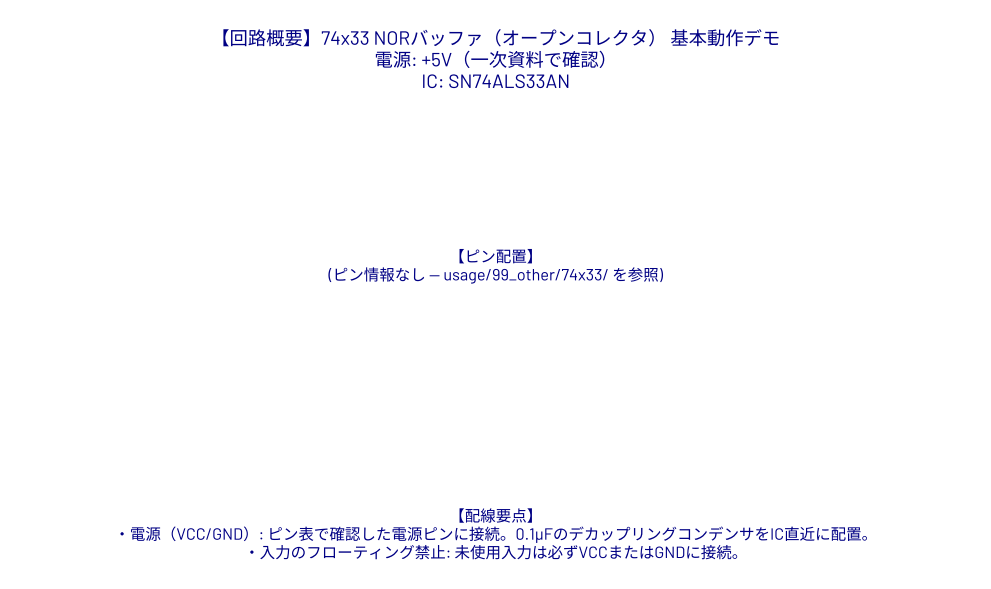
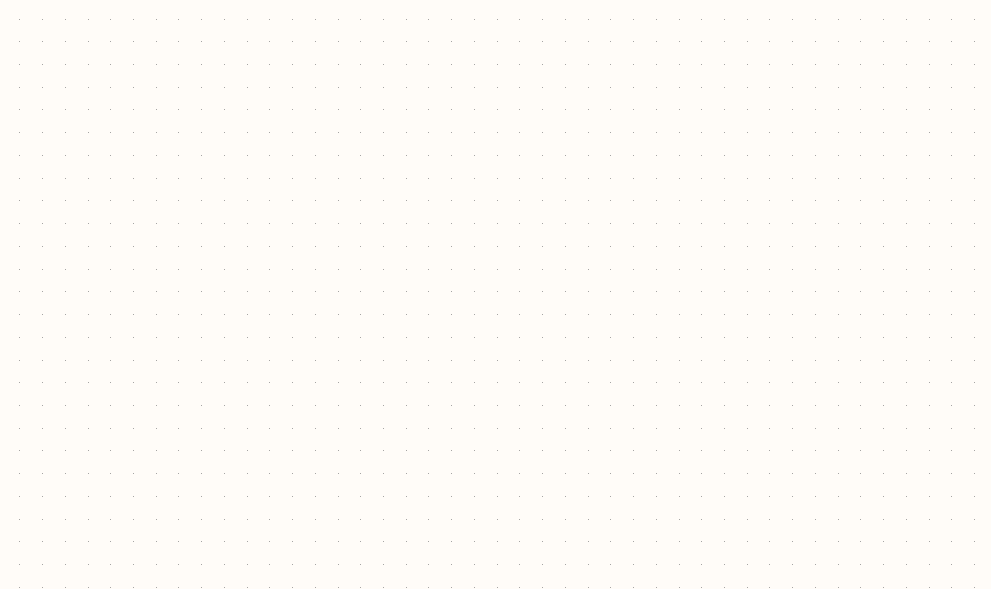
text: 【回路概要】74x33 NORバッファ（オープンコレクタ） 基本動作デモ (500, 37) -> none
text: 電源: +5V（一次資料で確認） (490, 59) -> none
text: IC: SN74ALS33AN (495, 81) -> none
text: 【ピン配置】 (495, 256) -> none
text: (ピン情報なし — usage/99_other/74x33/ を参照) (495, 275) -> none
text: 【配線要点】 (495, 515) -> none
text: ・電源（VCC/GND）: ピン表で確認した電源ピンに接続。0.1µFのデカップリングコンデンサをIC直近に配置。 (493, 534) -> none
text: ・入力のフローティング禁止: 未使用入力は必ずVCCまたはGNDに接続。 (493, 552) -> none

